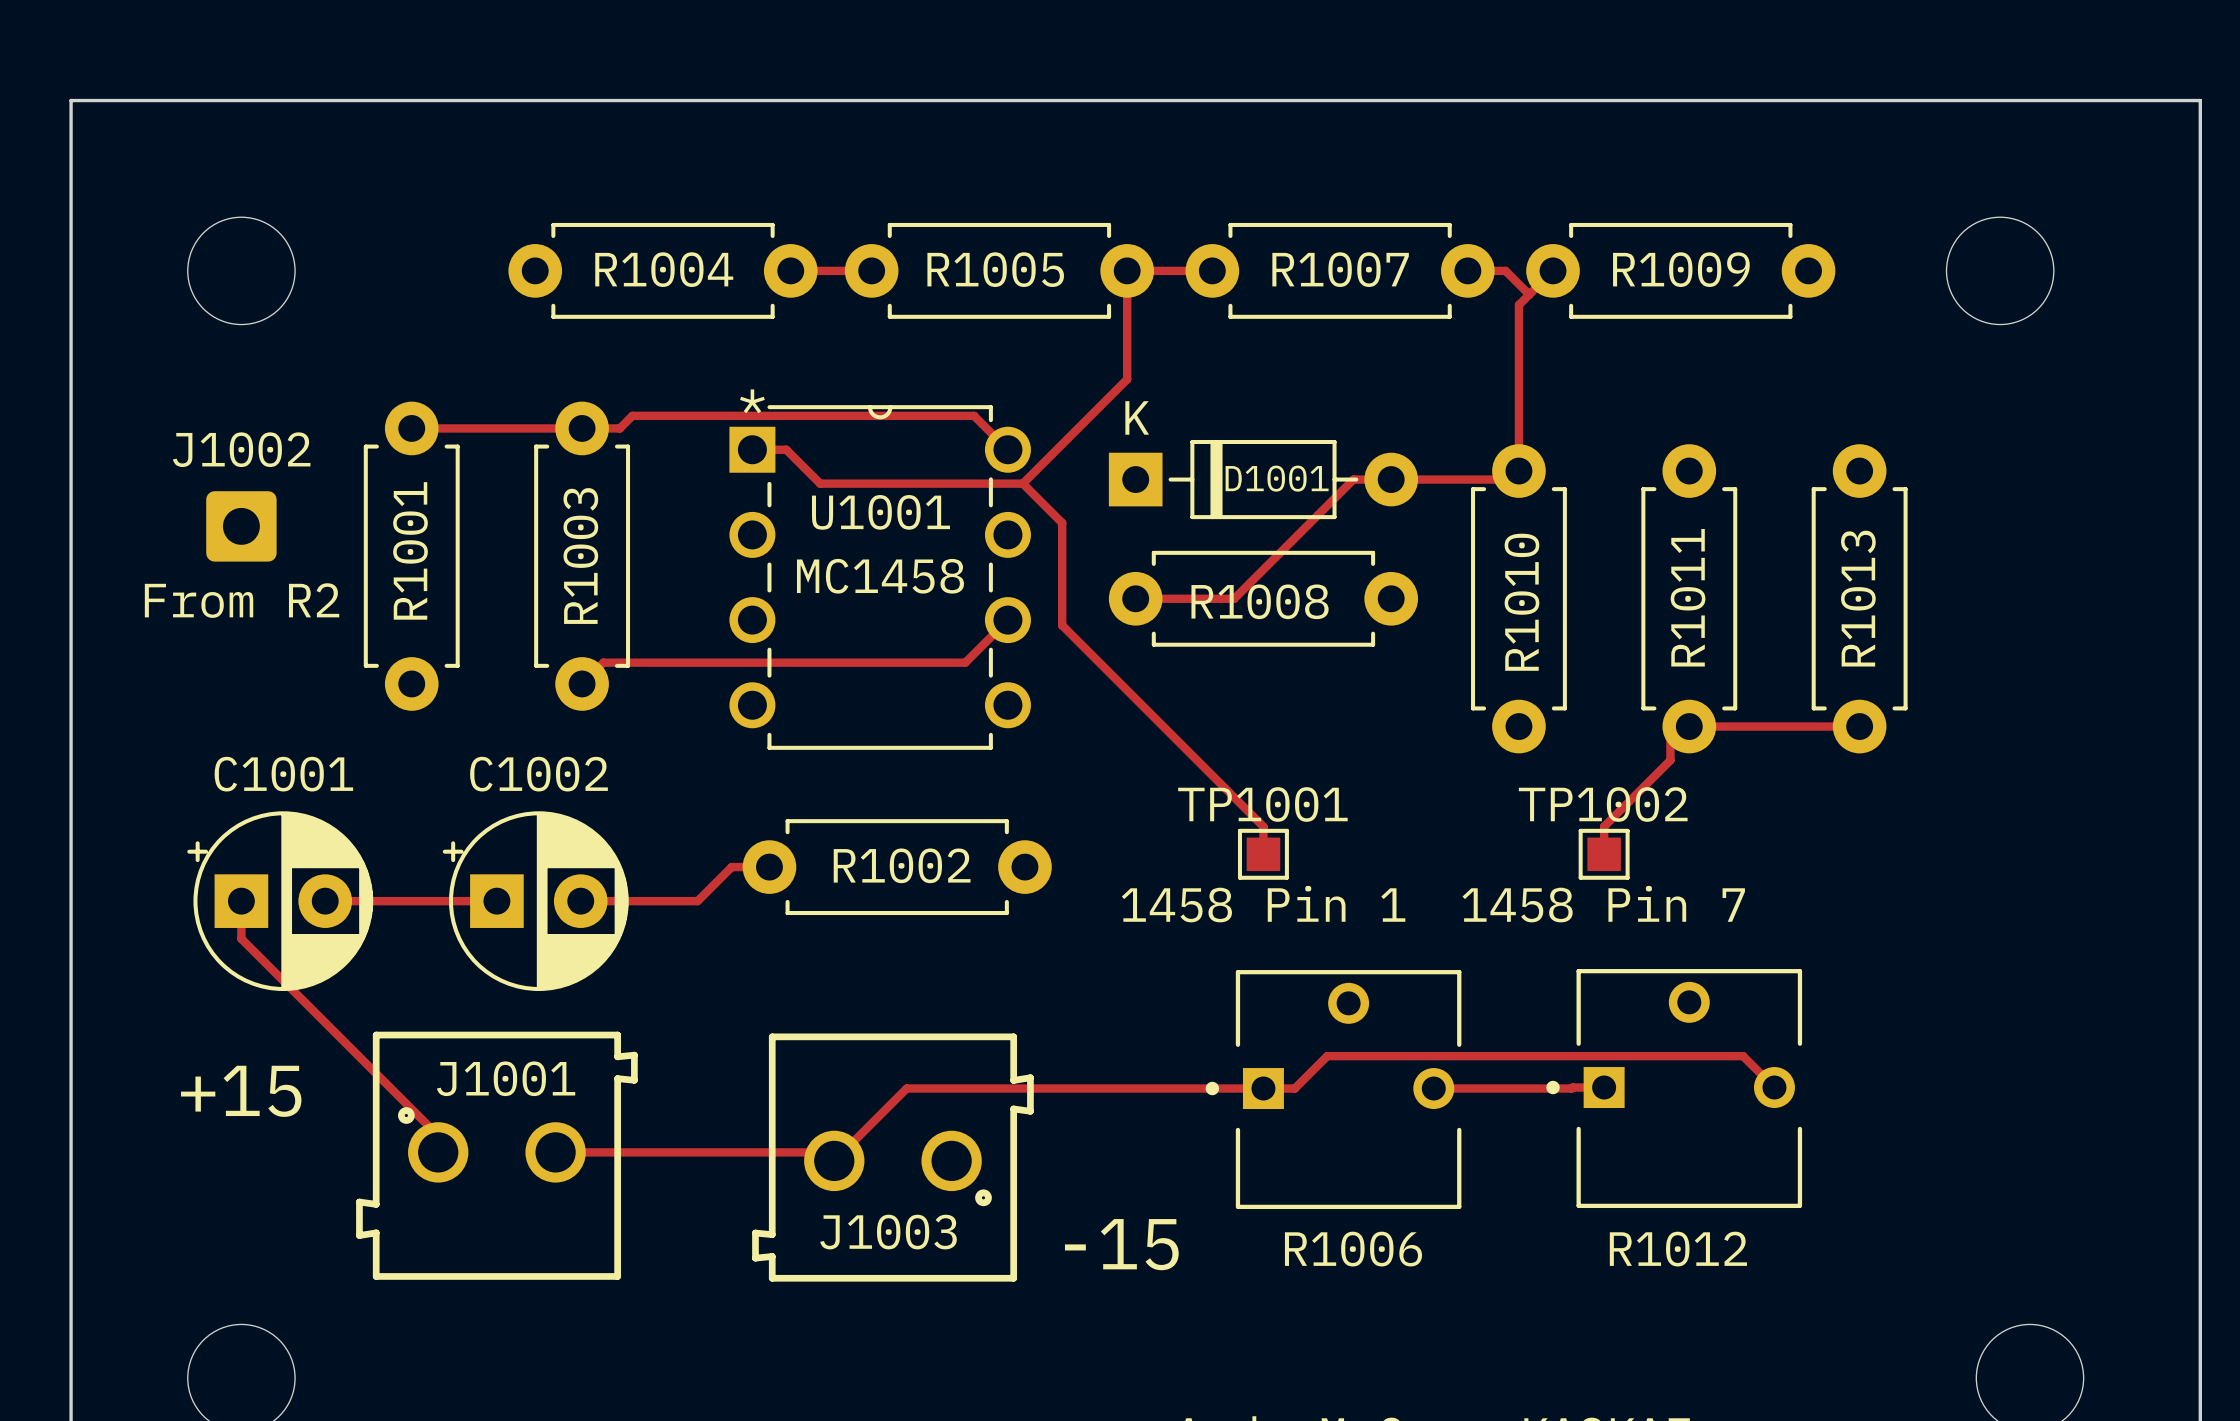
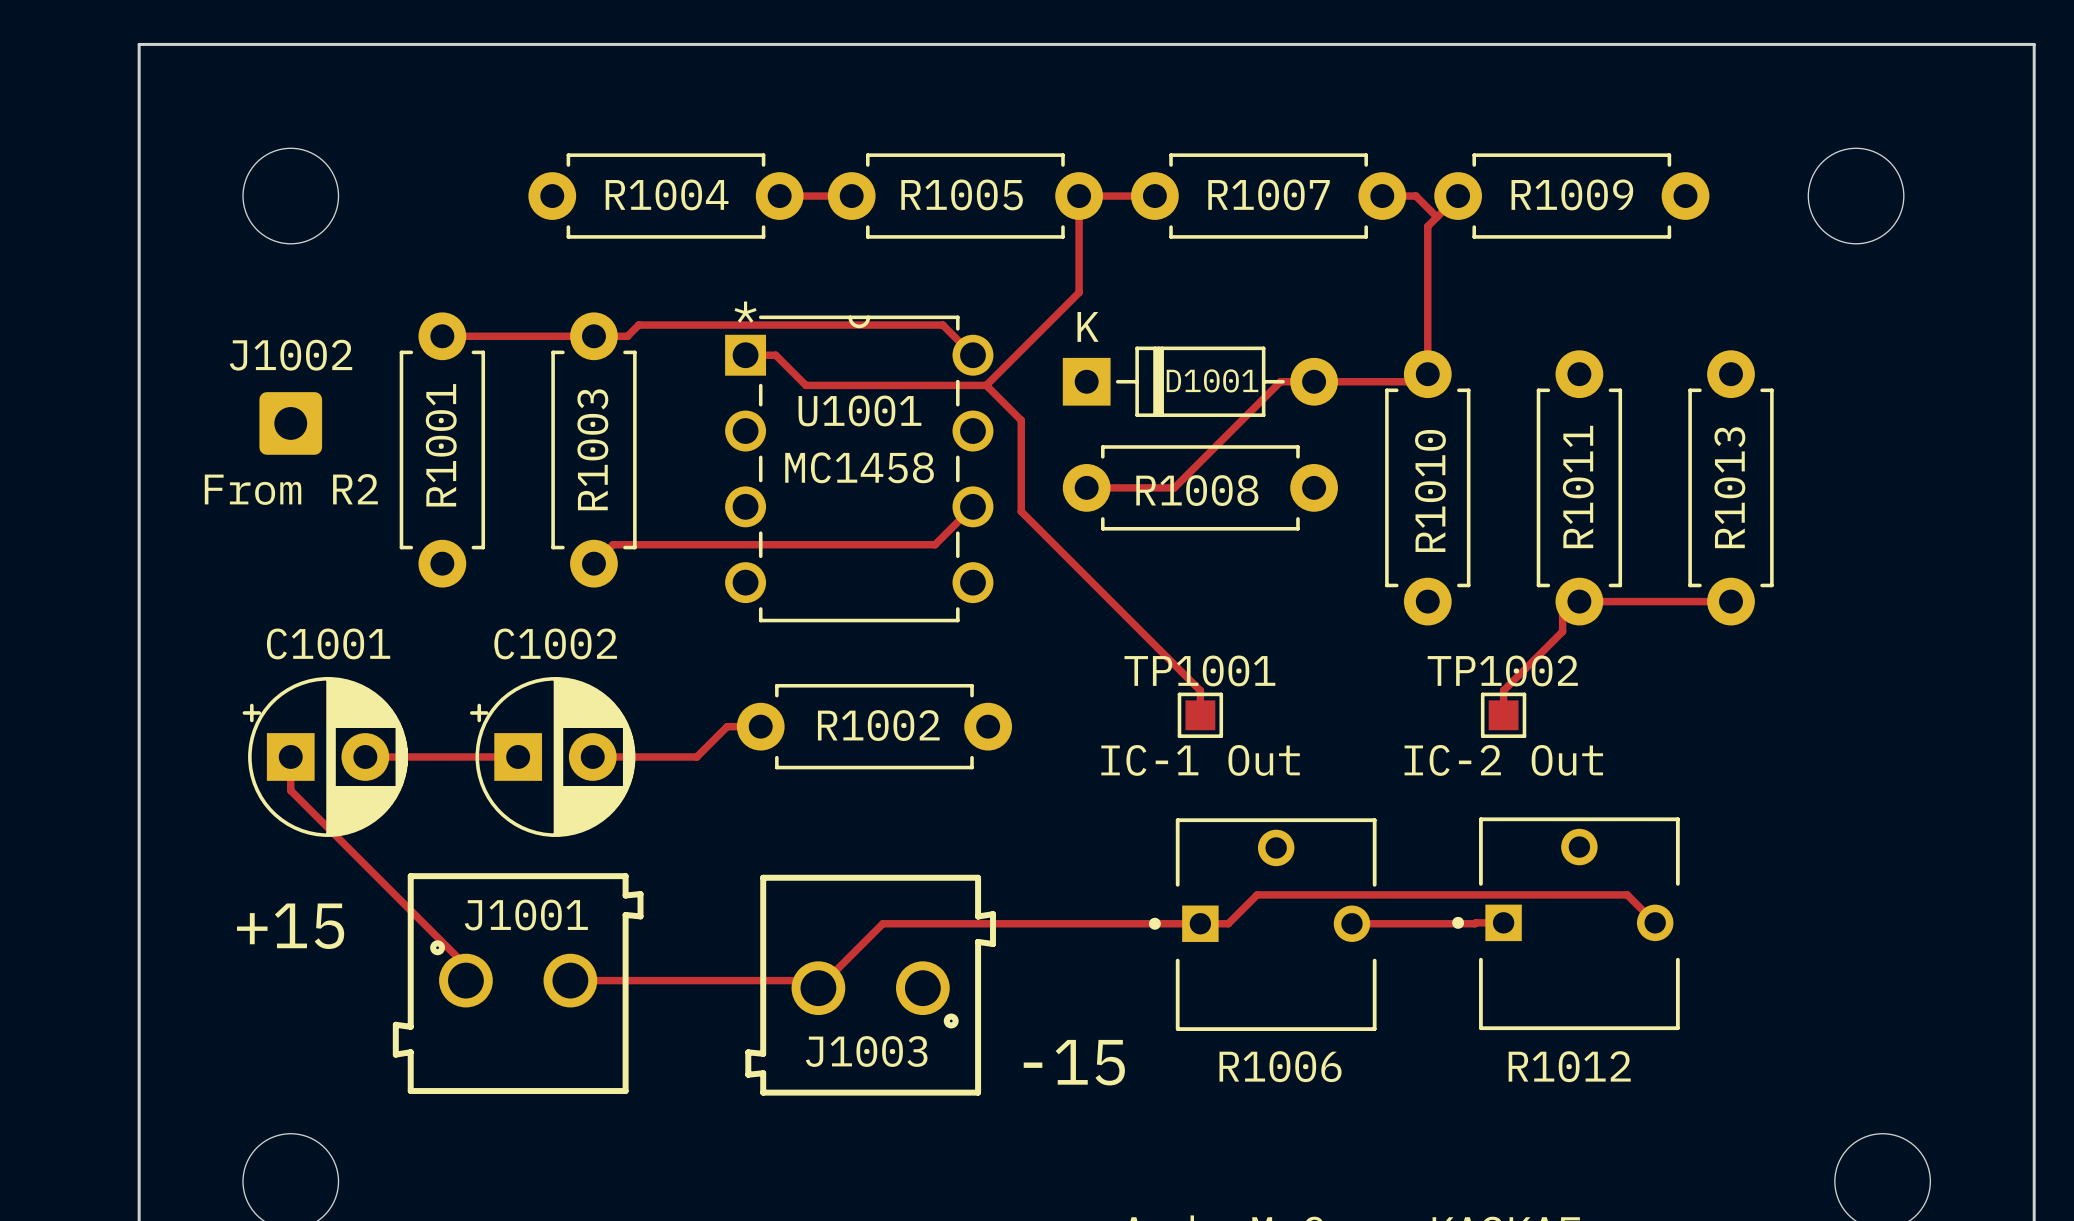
TP1001 value: 1458 Pin 1 (1263, 904) -> IC-1 Out (1200, 760)
TP1002 value: 1458 Pin 7 (1603, 904) -> IC-2 Out (1503, 760)

